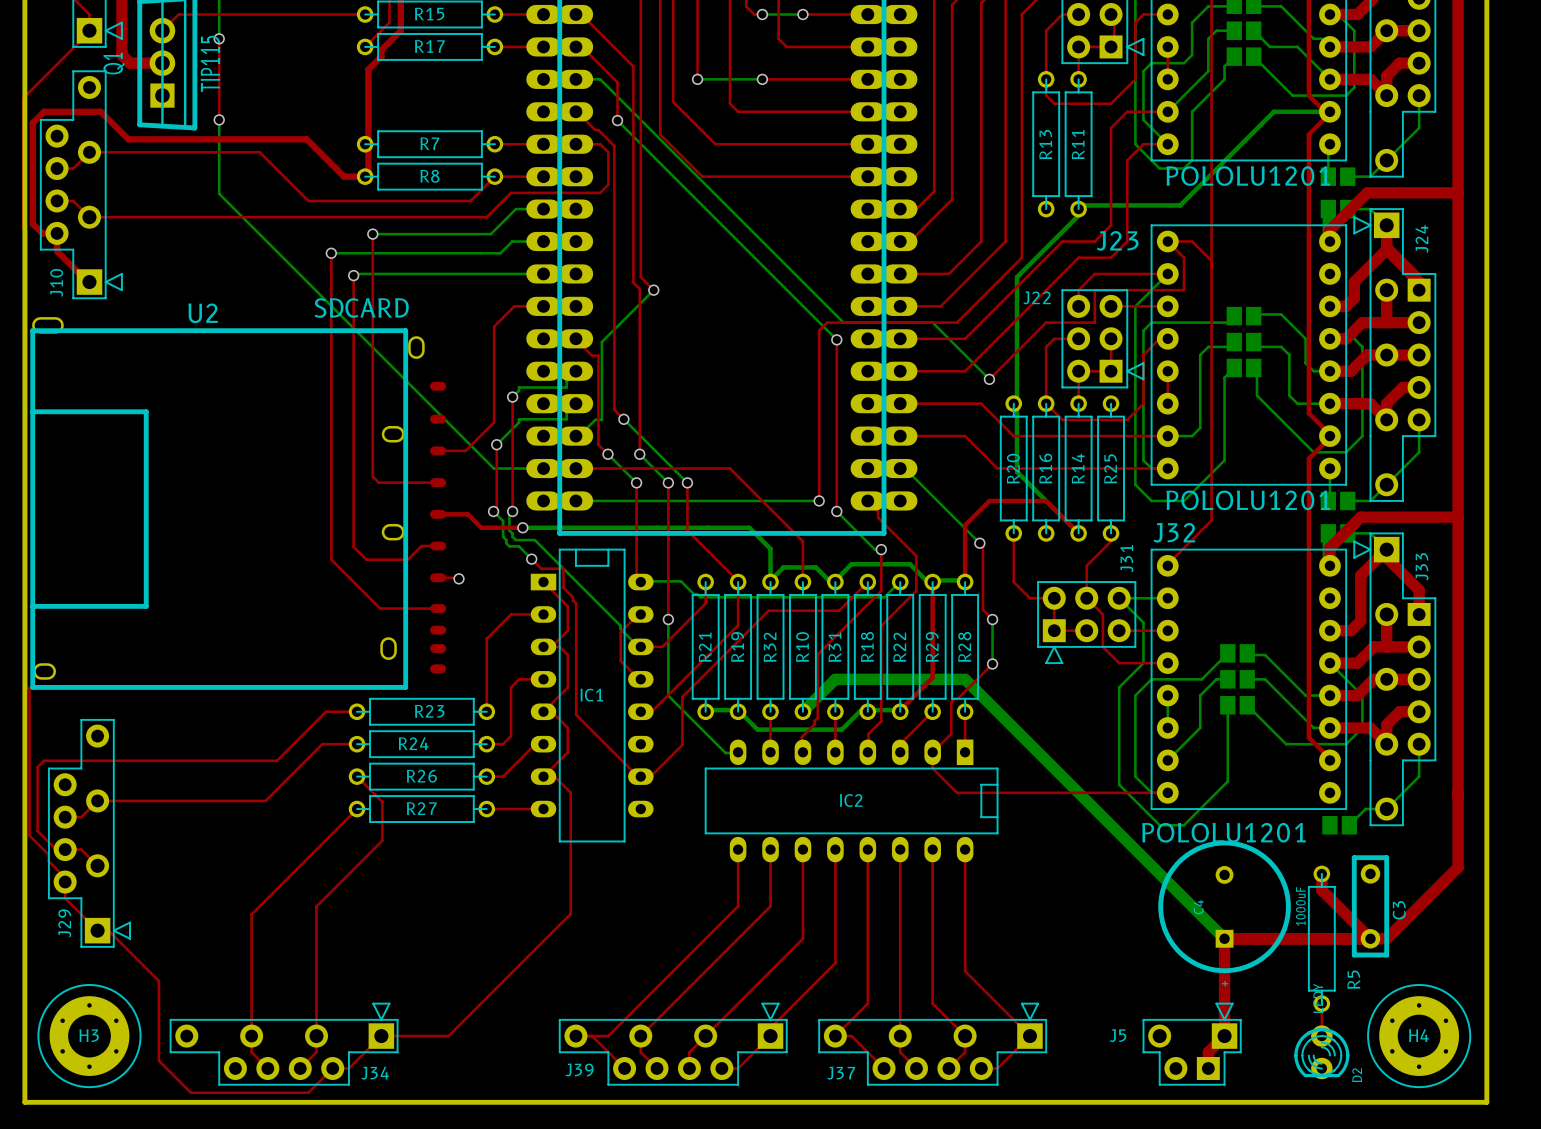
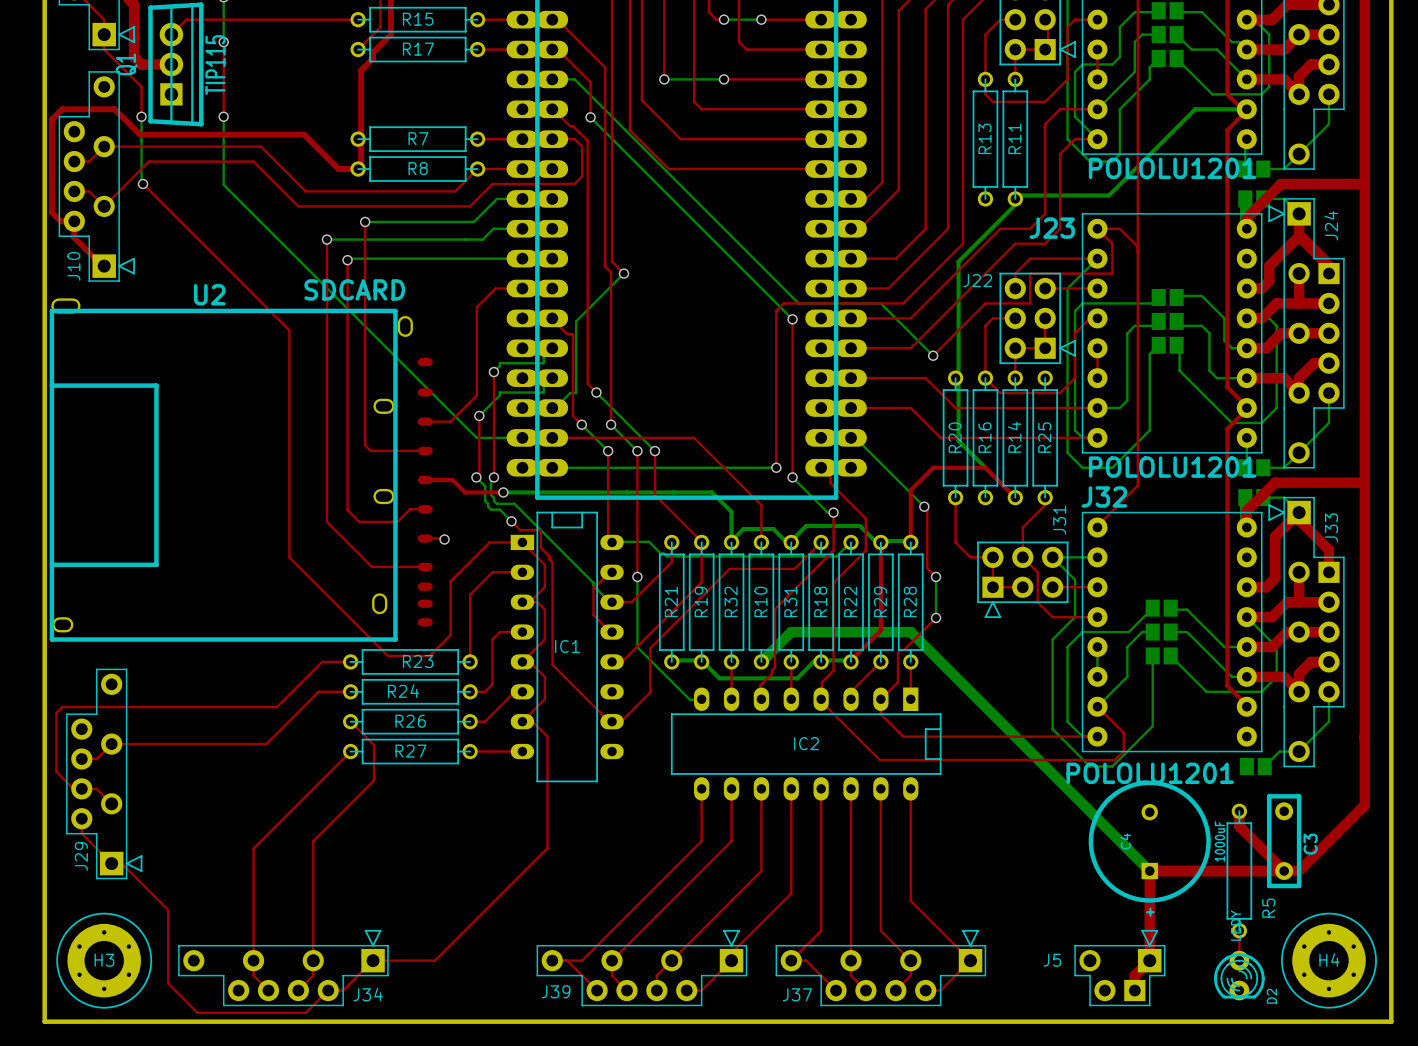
top track: (89, 30) (23, 98) (23, 228) (26, 231) (26, 686) (29, 689) (29, 835) (48, 854) (48, 861) (64, 876) (65, 882) -> (104, 34) (104, 49) (141, 86) (141, 116)
bottom track: none -> (141, 116) (141, 185)
via: none -> (141, 116)
top track: none -> (143, 183) (289, 330) (289, 557) (387, 655) (429, 655) (450, 635) (450, 581) (489, 542) (522, 542)
via: none -> (143, 183)
top track: (89, 217) (300, 217) -> (104, 206) (149, 161) (253, 161) (298, 206)
top track: none -> (821, 699) (879, 759) (1114, 759) (1123, 751) (1123, 733) (1097, 706)

